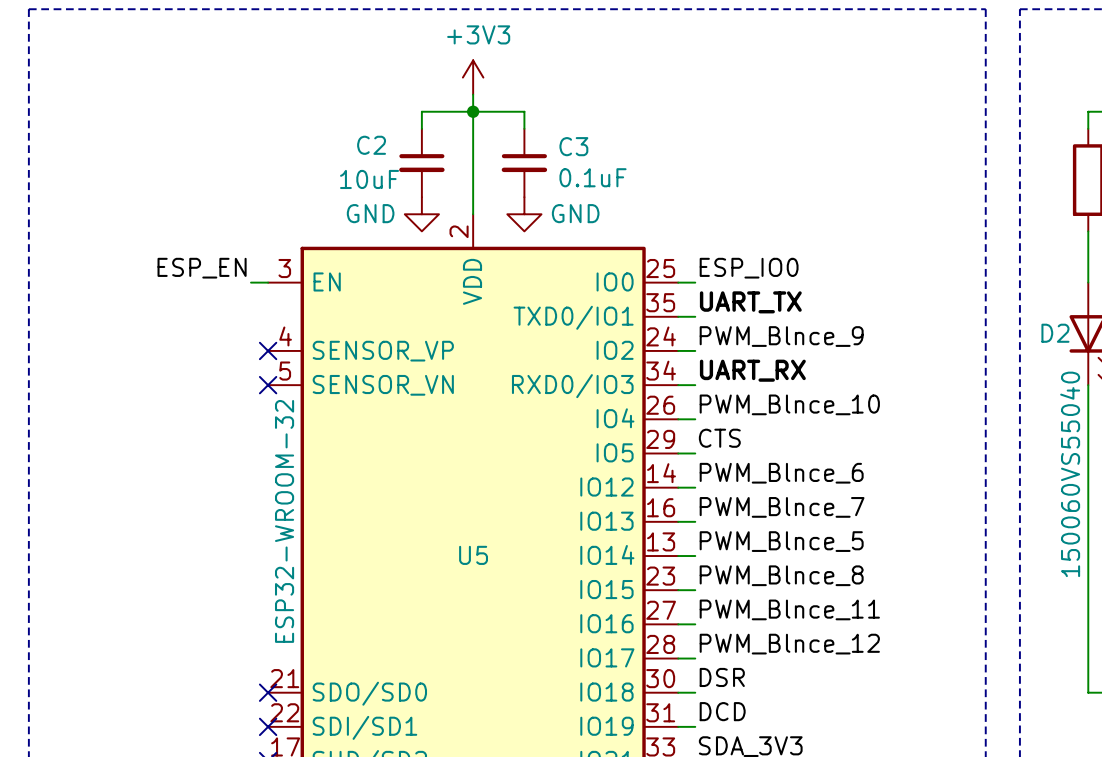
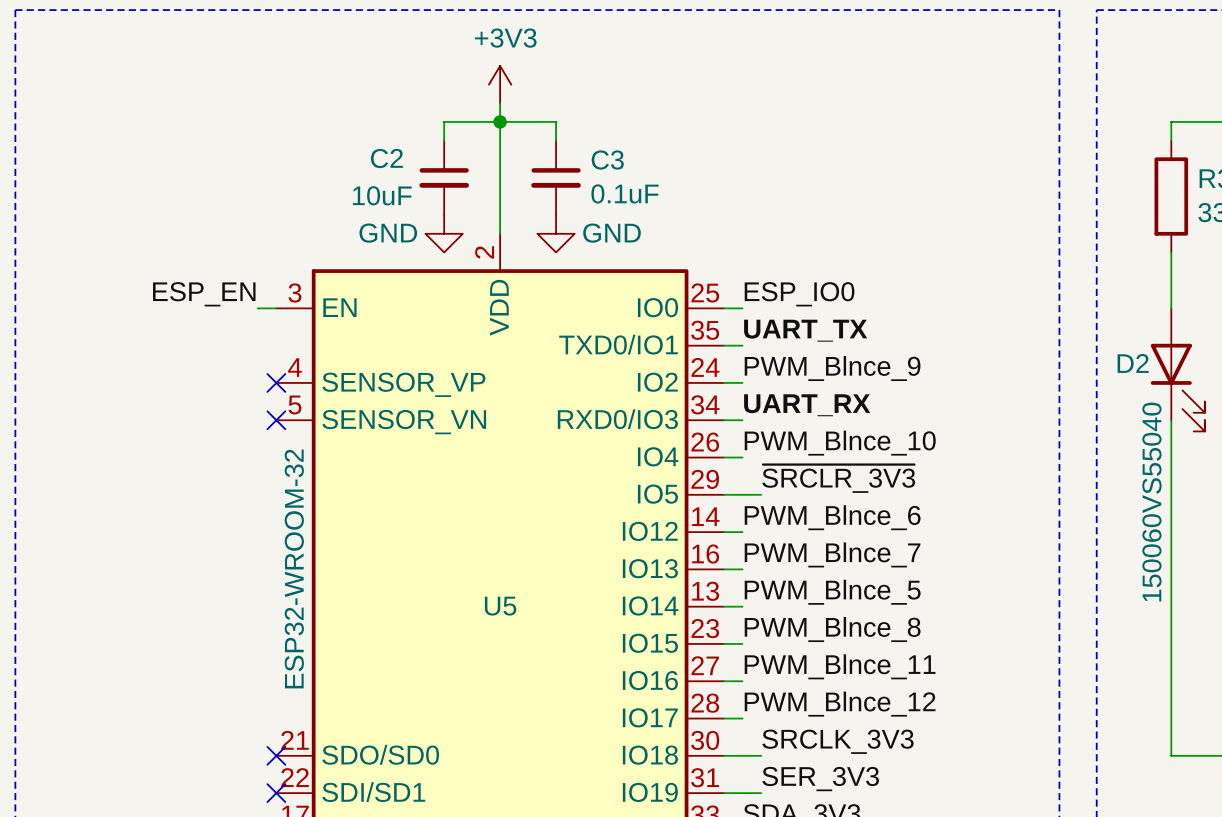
label: none -> ~{SRCLR_3V3} (838, 478)
label: CTS (719, 438) -> none
wire: none -> (742, 494) (761, 494)
label: DSR (722, 677) -> none
label: none -> SRCLK_3V3 (837, 741)
wire: none -> (742, 755) (761, 755)
label: DCD (722, 711) -> none
label: none -> SER_3V3 (820, 779)
wire: none -> (742, 793) (761, 793)

